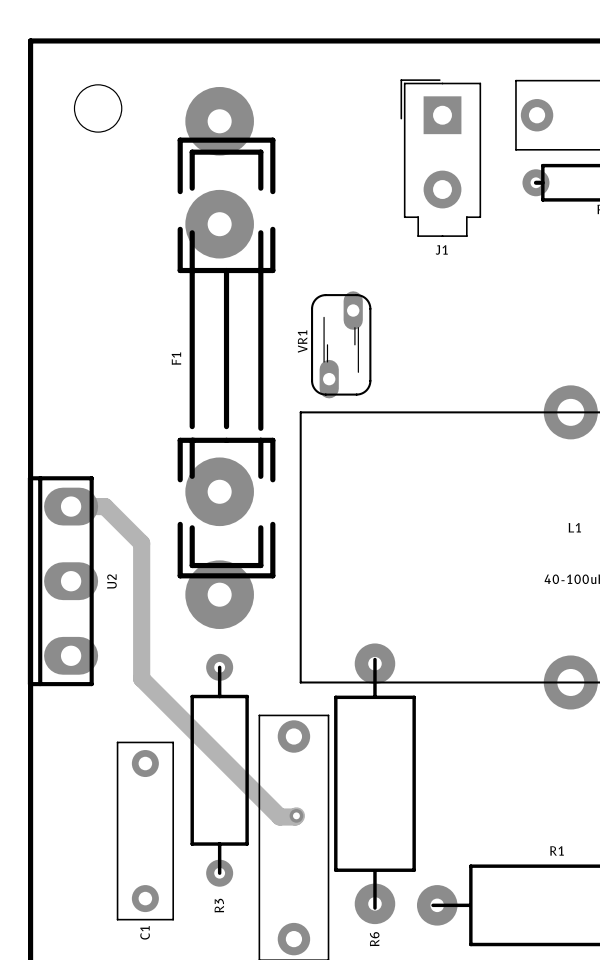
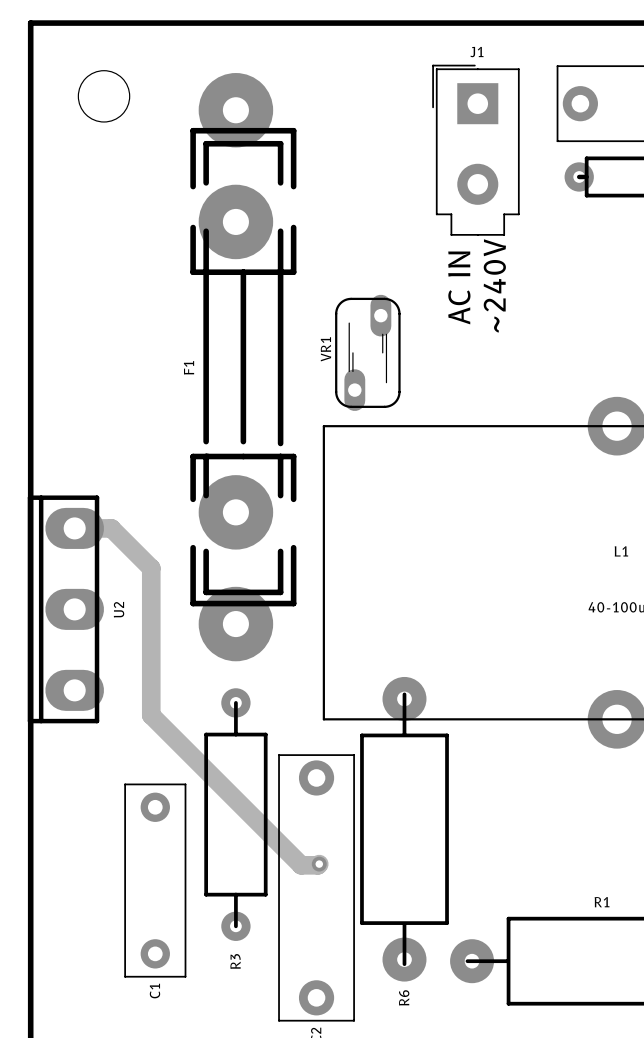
J1 name position: J1 (441, 249) -> J1 (476, 52)
text: none -> ~240V (494, 285)
text: none -> AC IN (459, 287)

